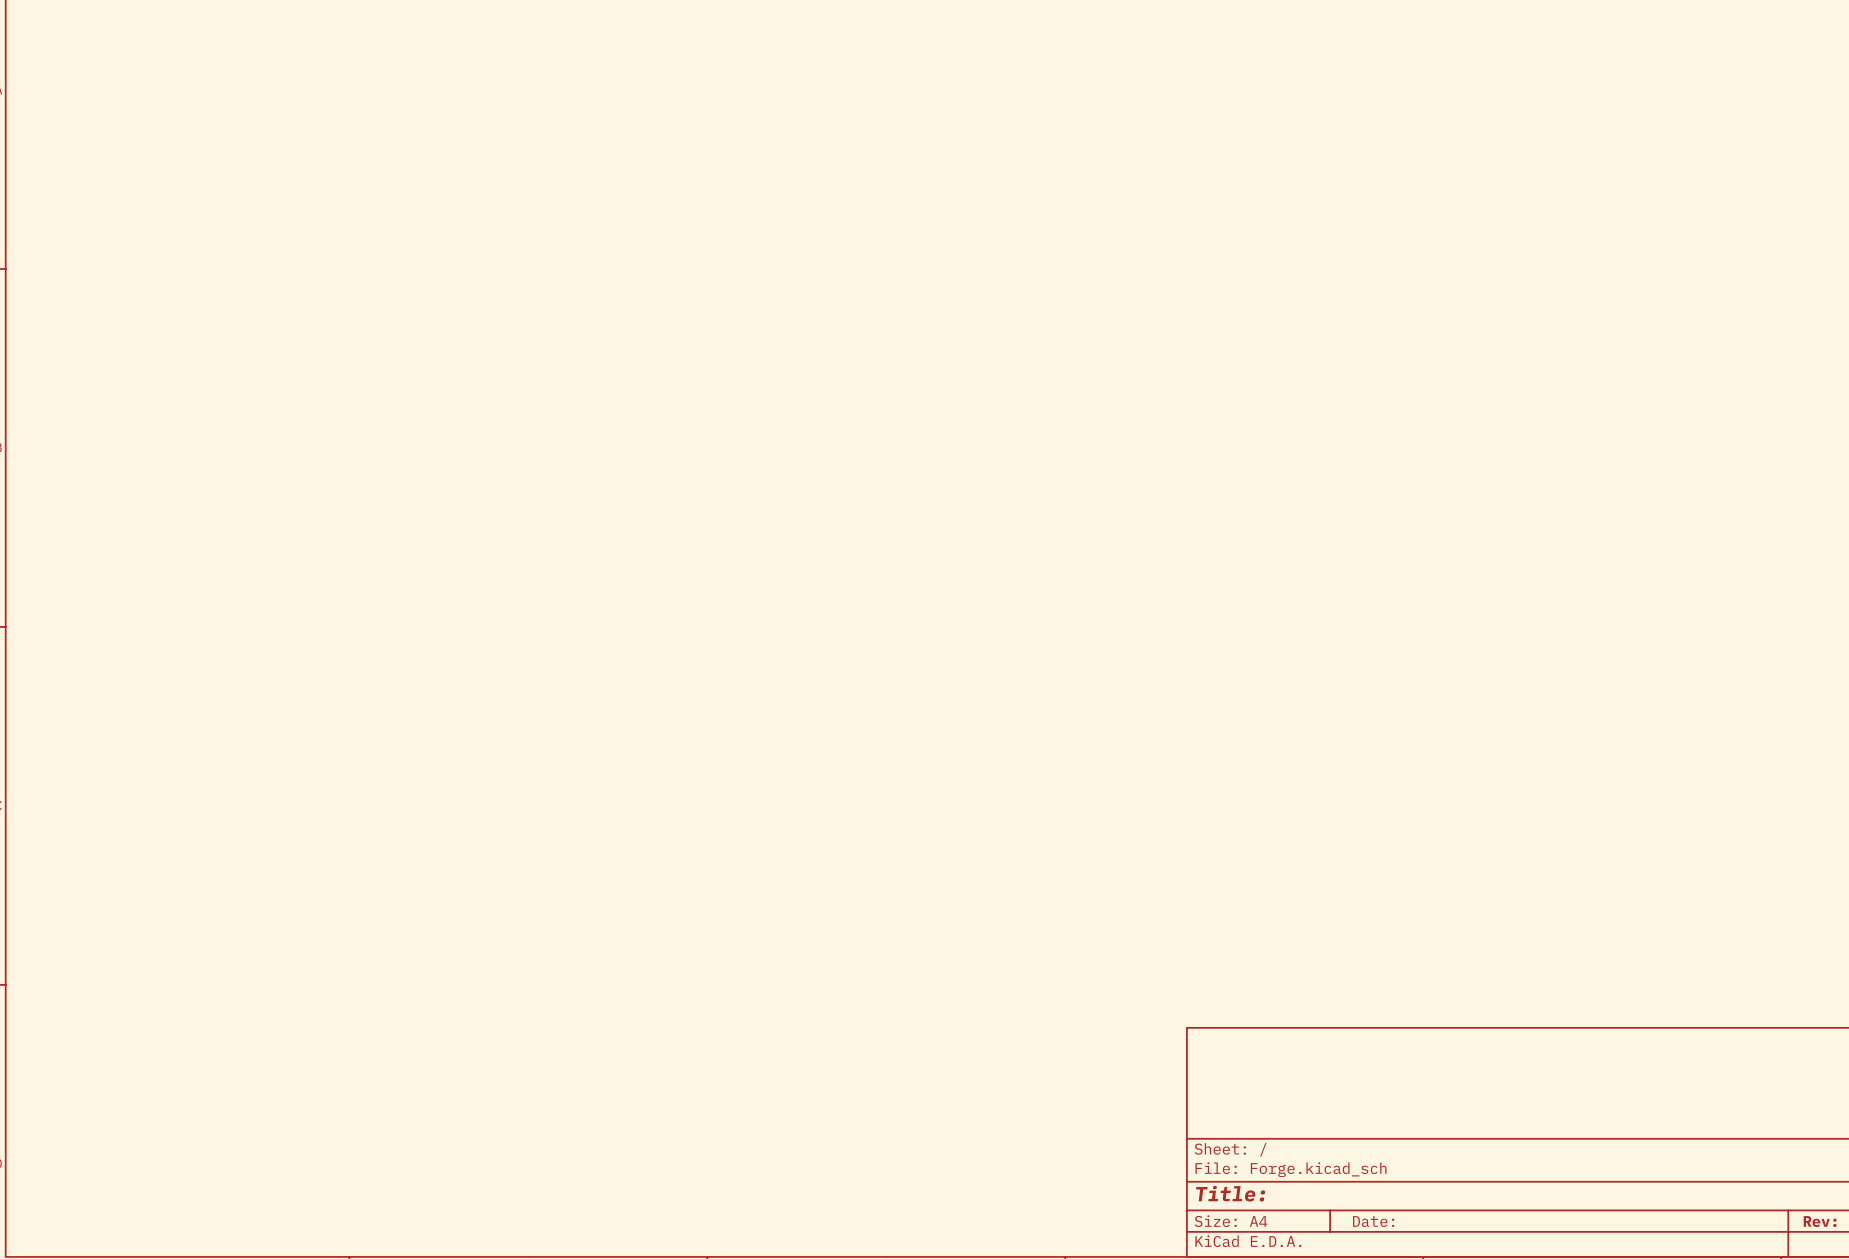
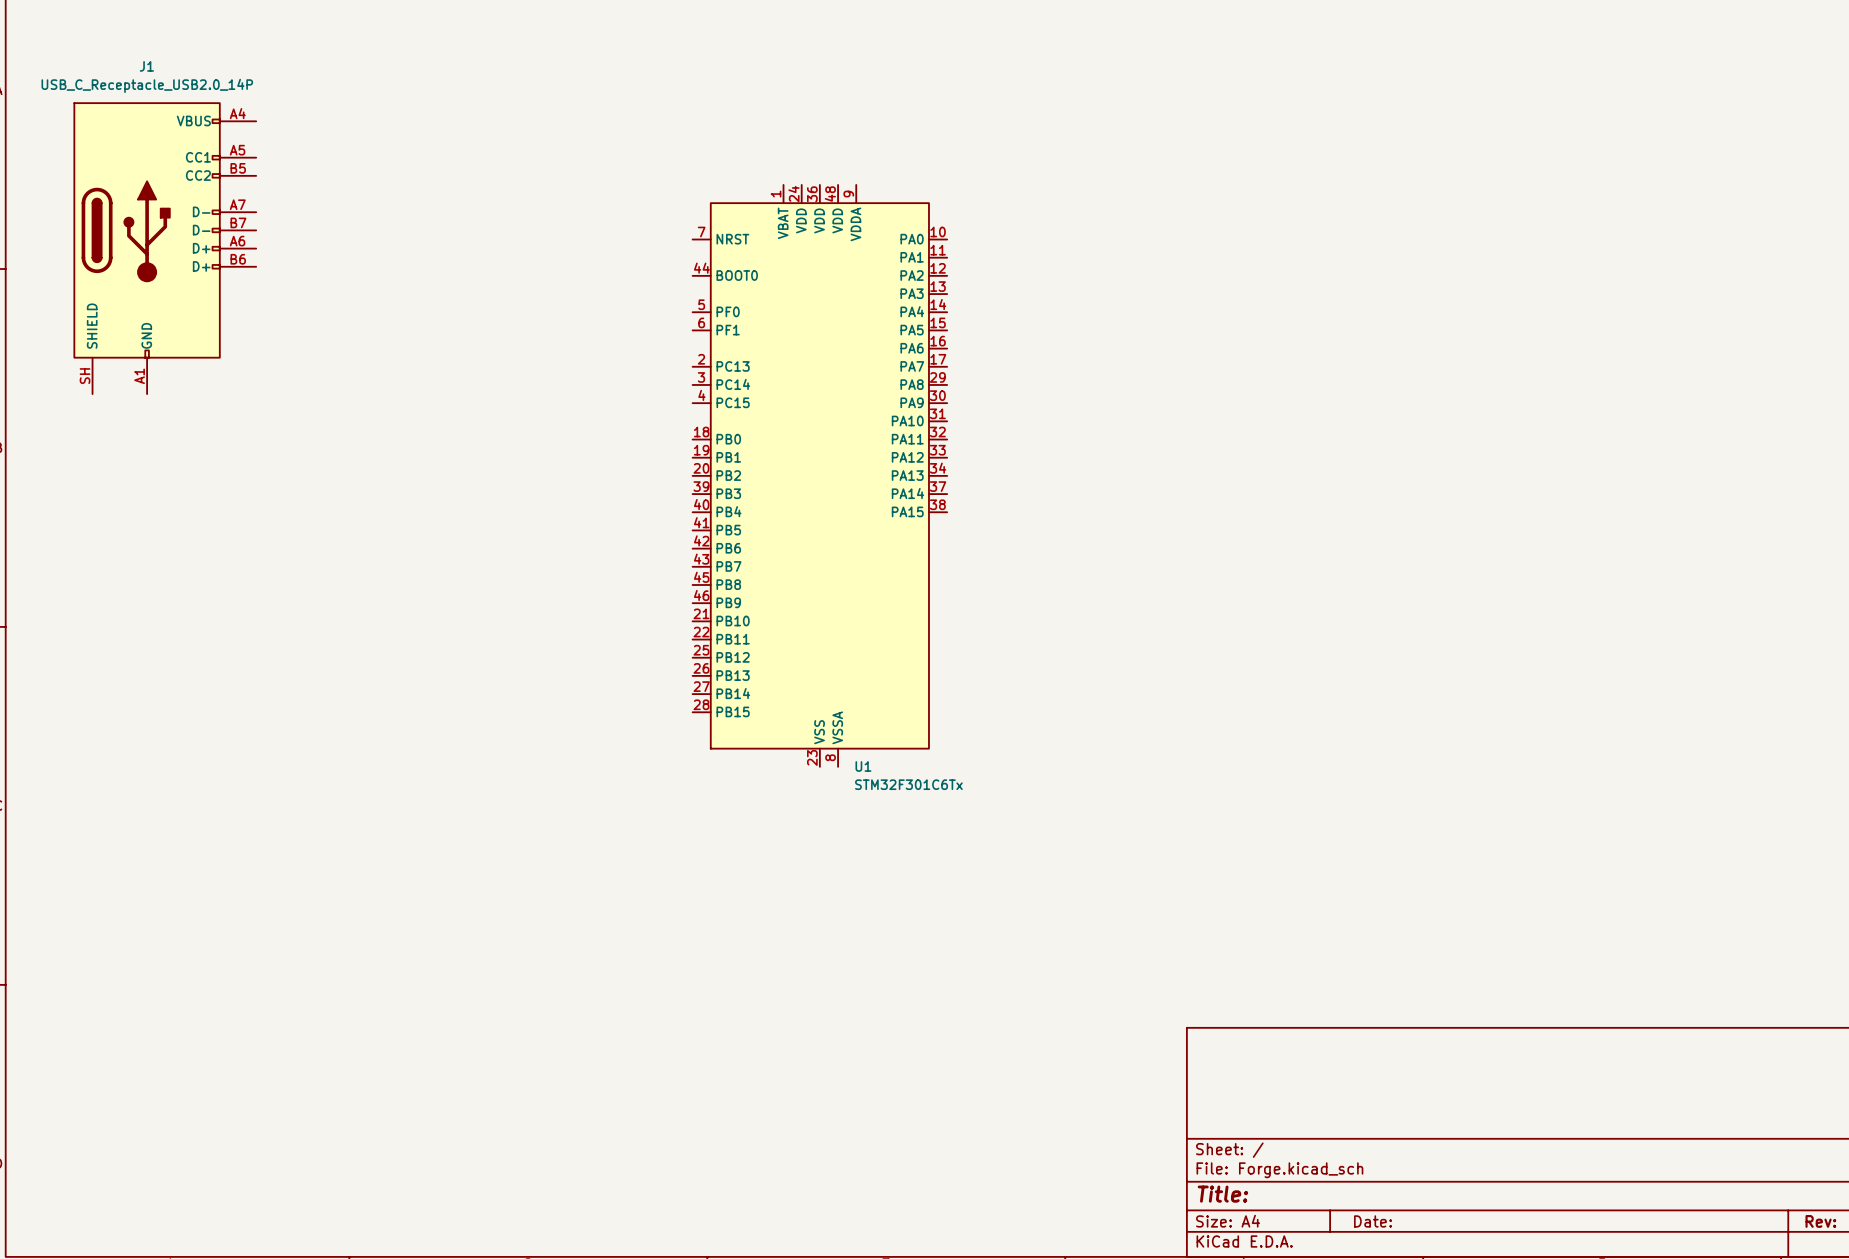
J1: none -> USB_C_Receptacle_USB2.0_14P (164, 248)
U1: none -> STM32F301C6Tx (819, 475)

